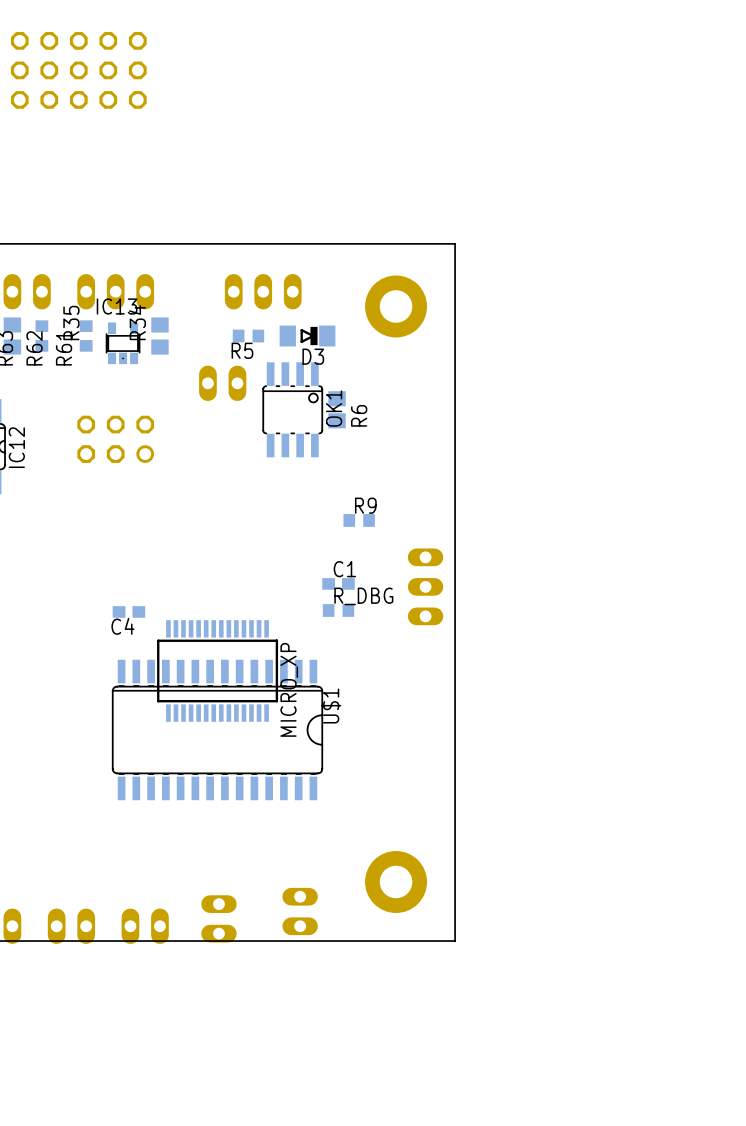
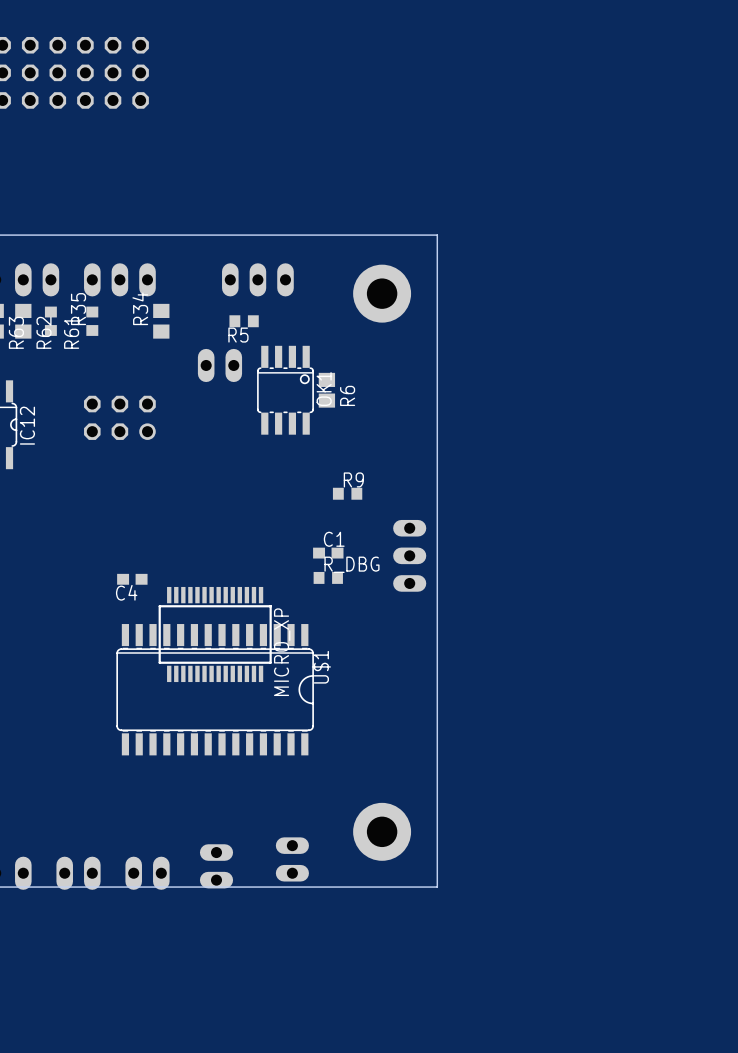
D3: (307, 336) -> none
IC13: (123, 343) -> none

